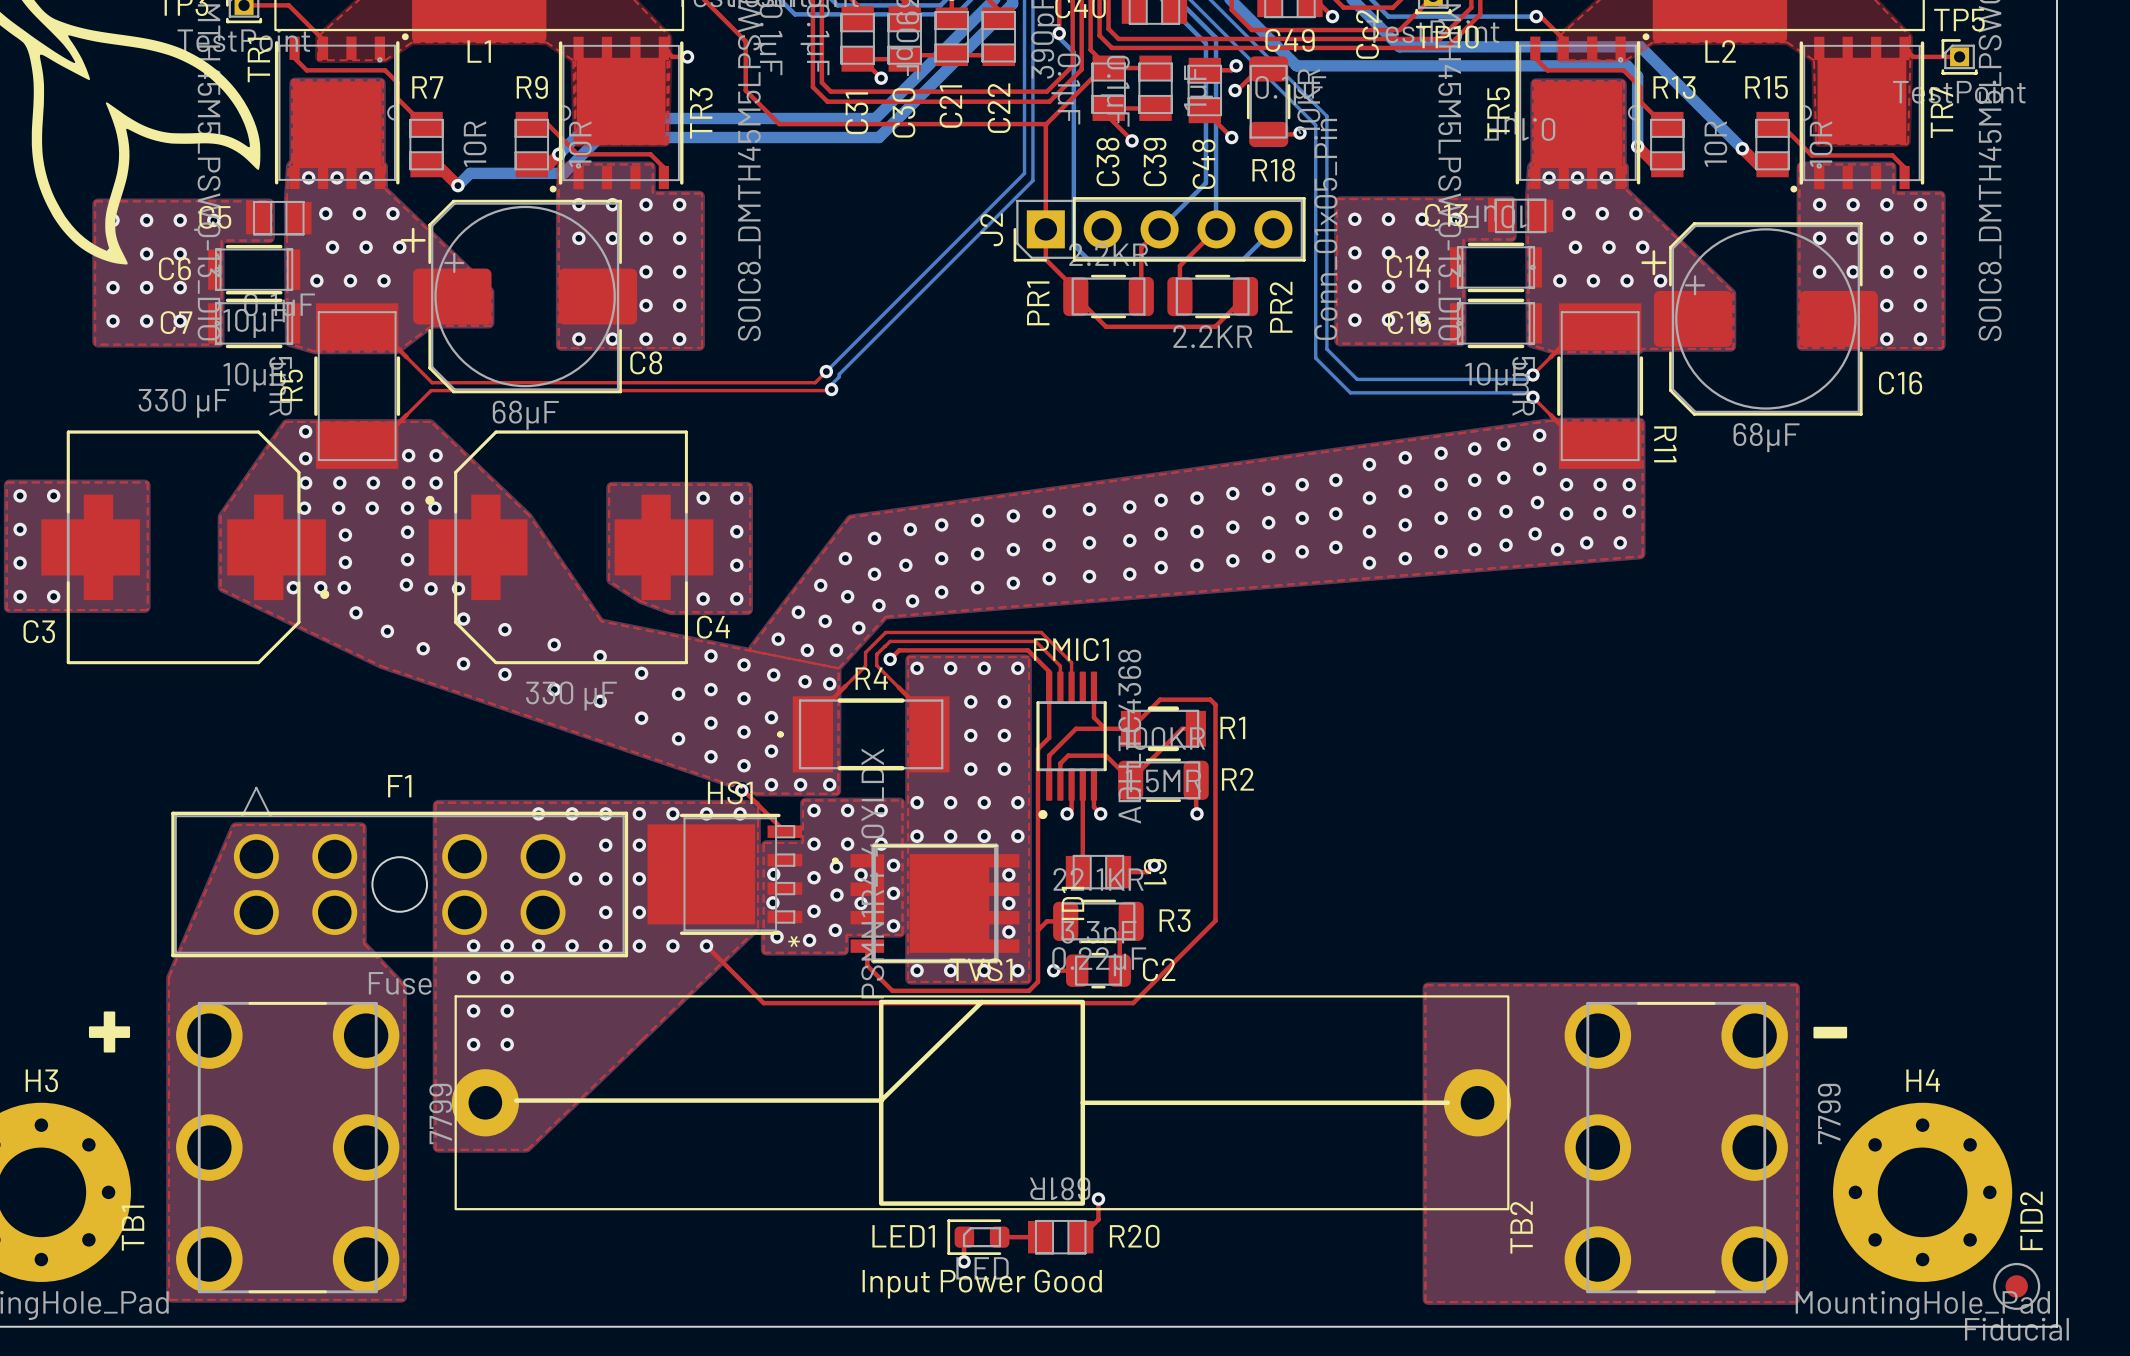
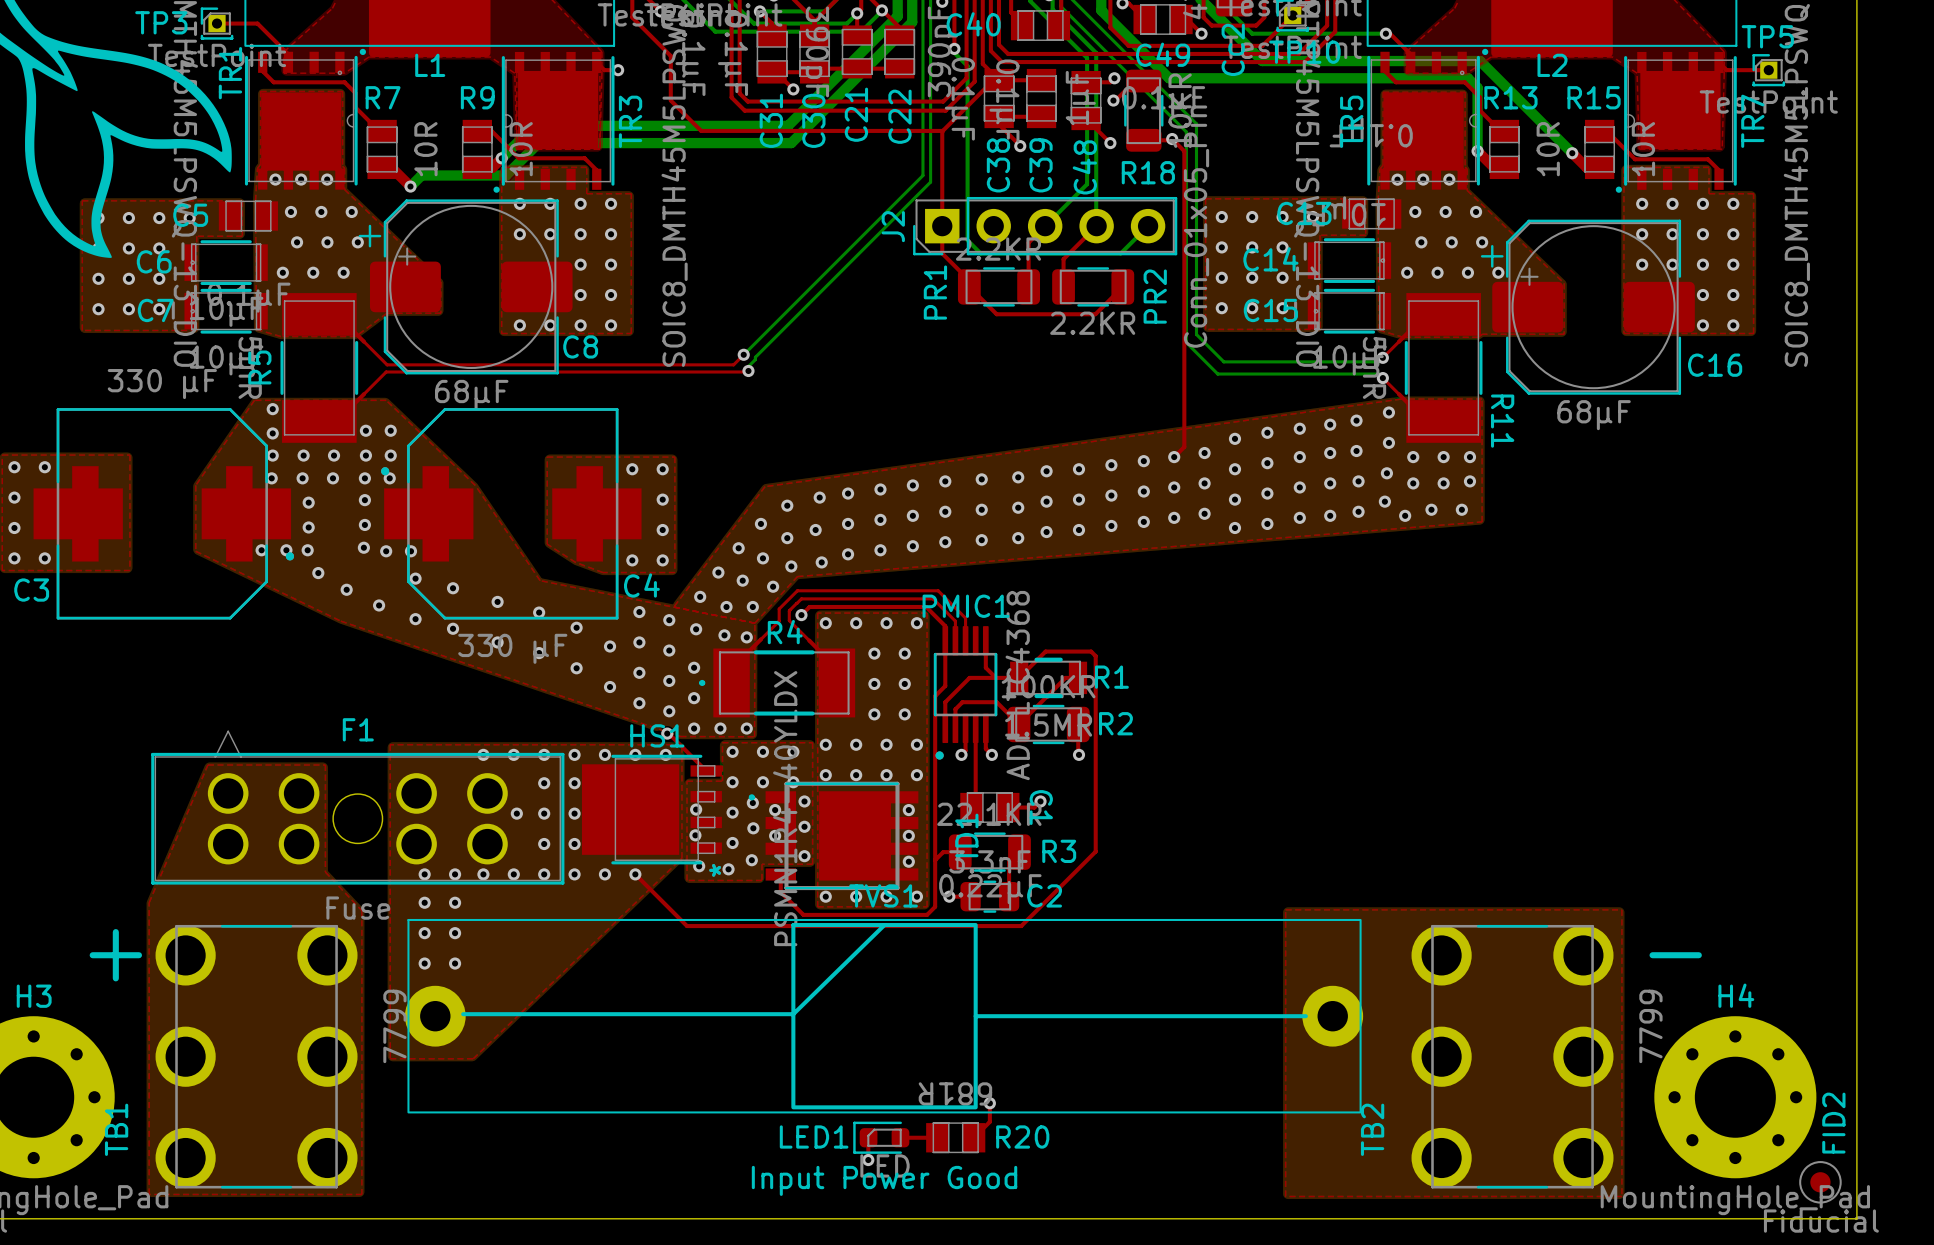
top track: none -> (1172, 139) (1184, 151) (1184, 446) (1174, 457)

